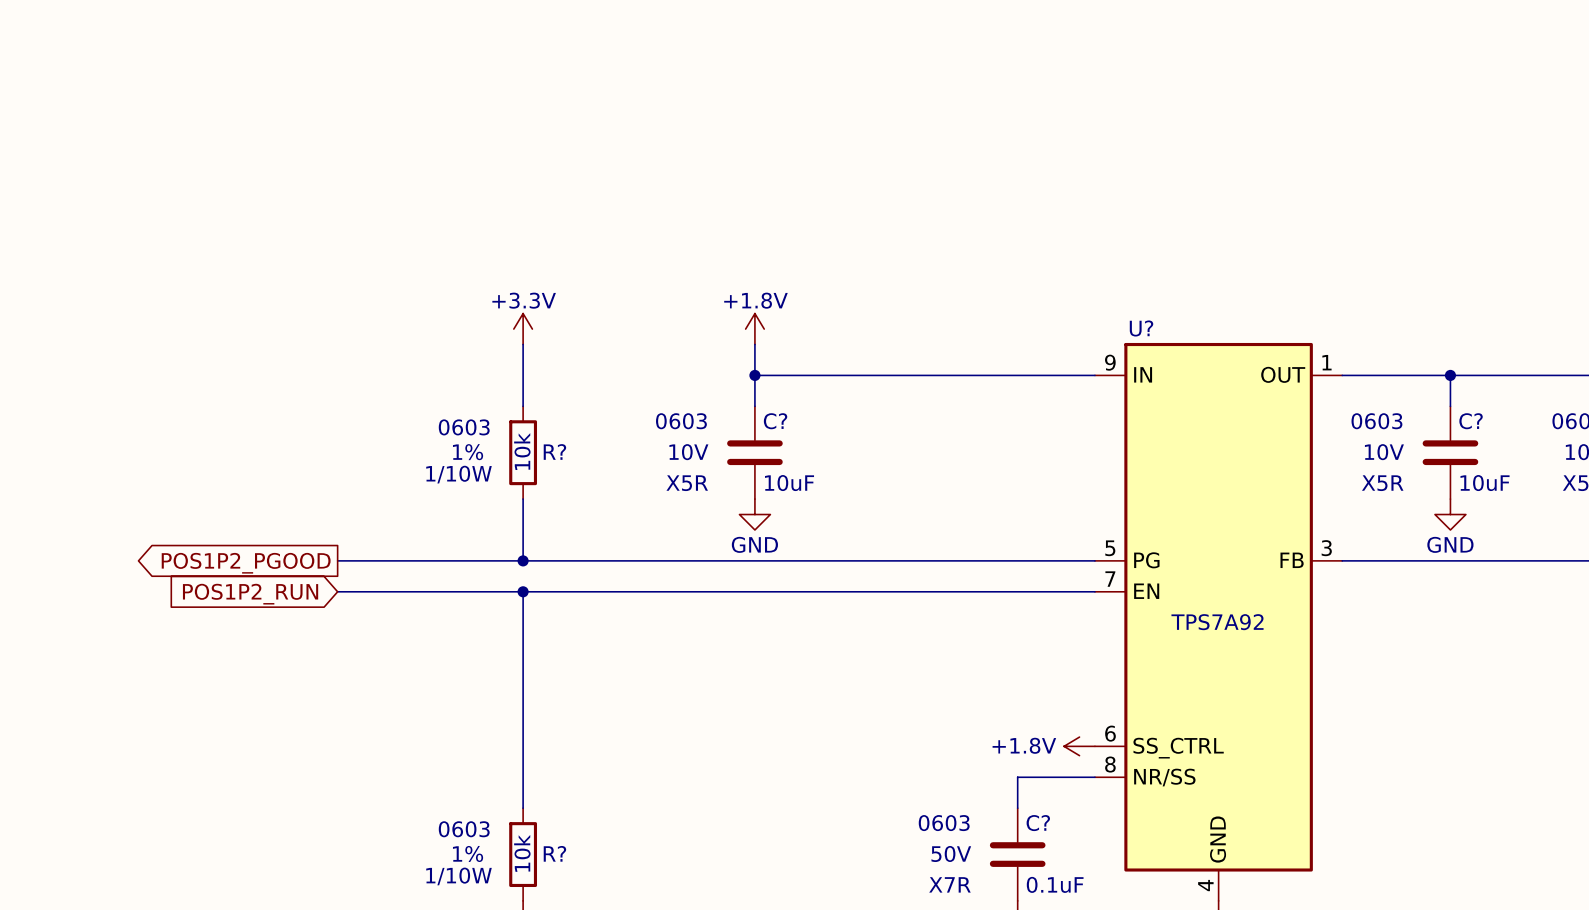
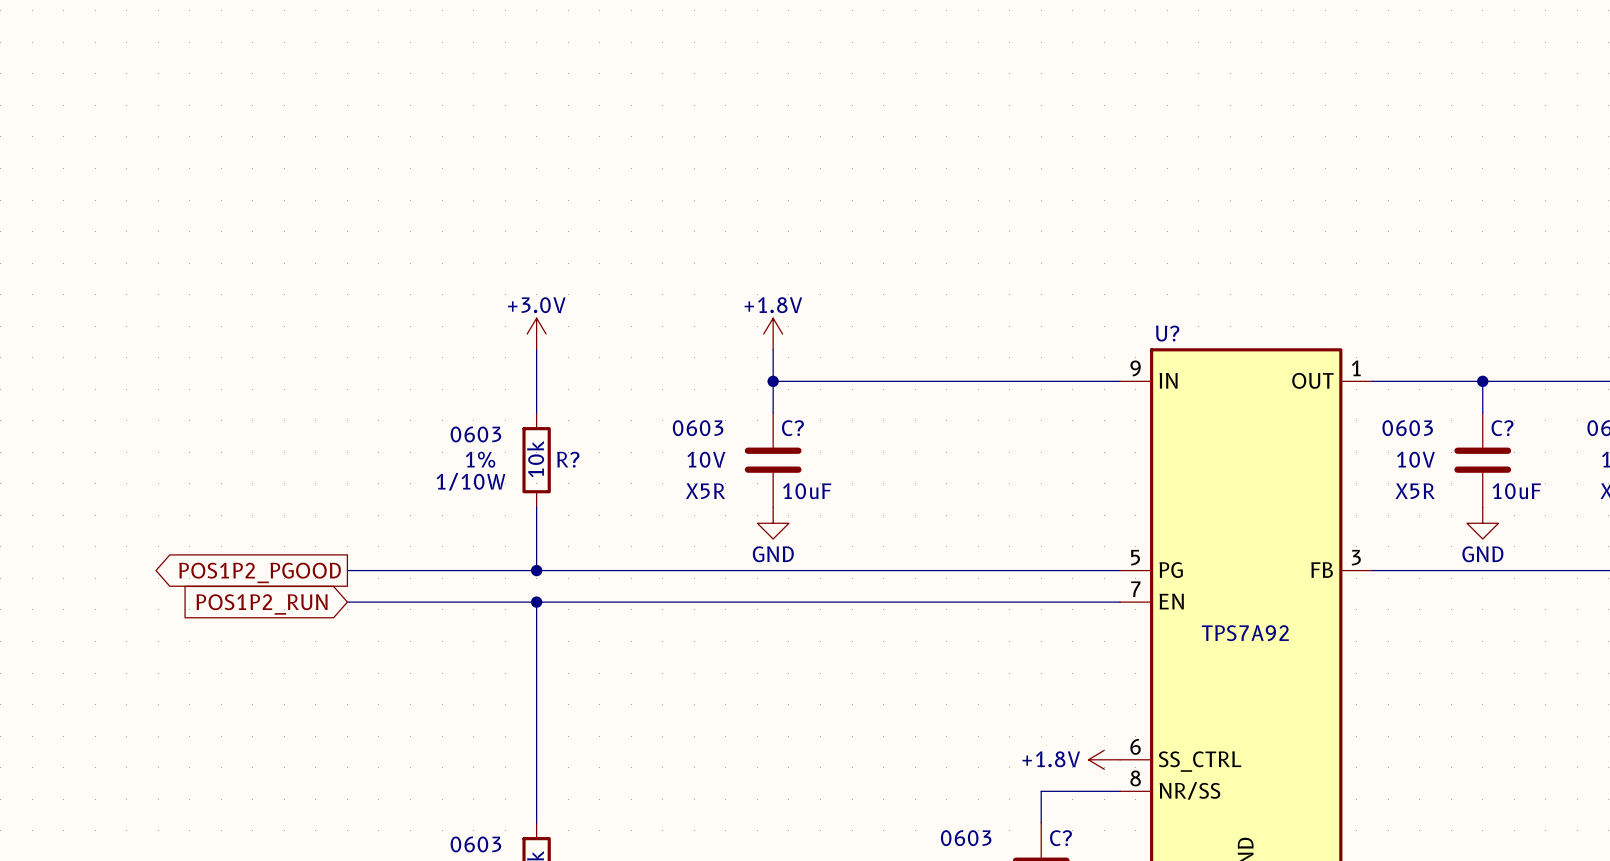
power symbol: +3.3V (523, 329) -> +3.0V (536, 334)

